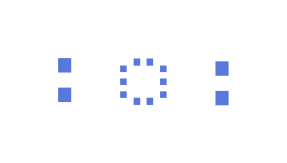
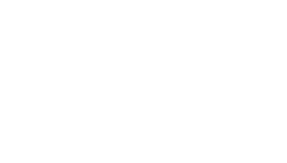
part: (64, 80) -> none
part: (143, 81) -> none
part: (222, 83) -> none

